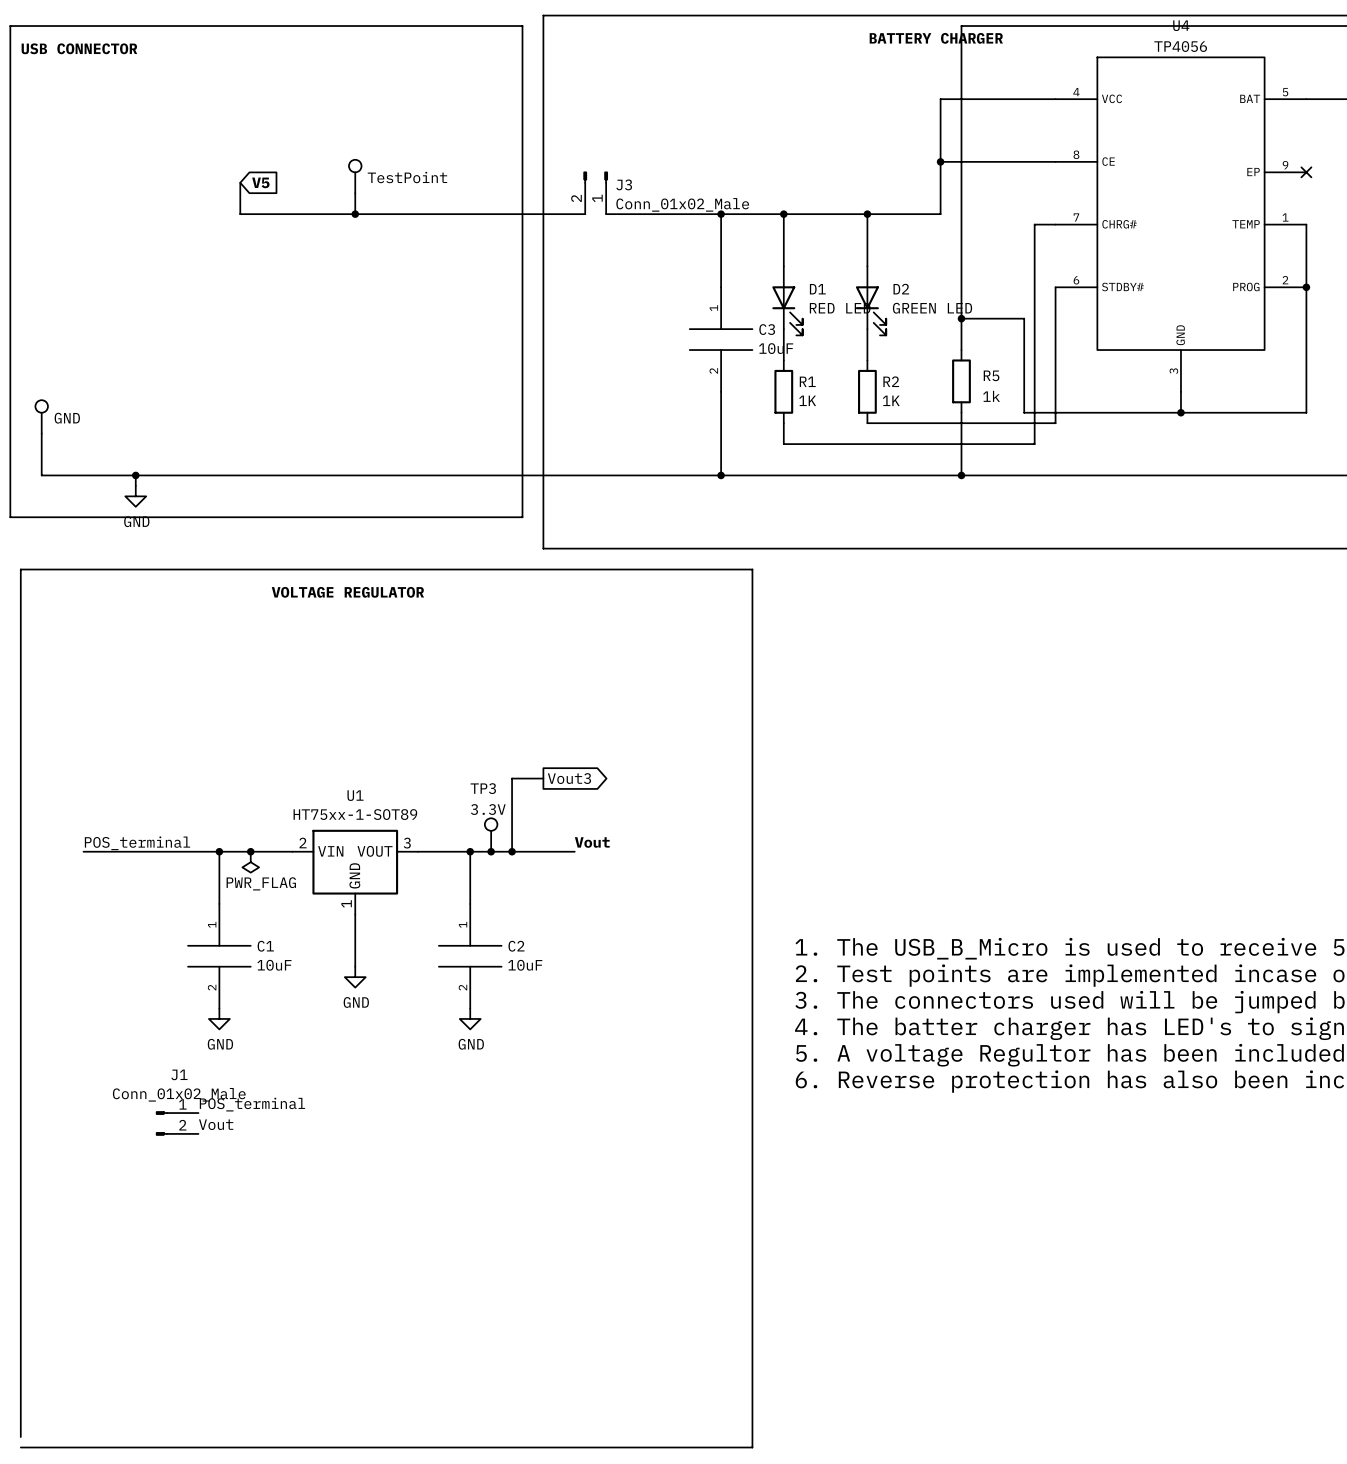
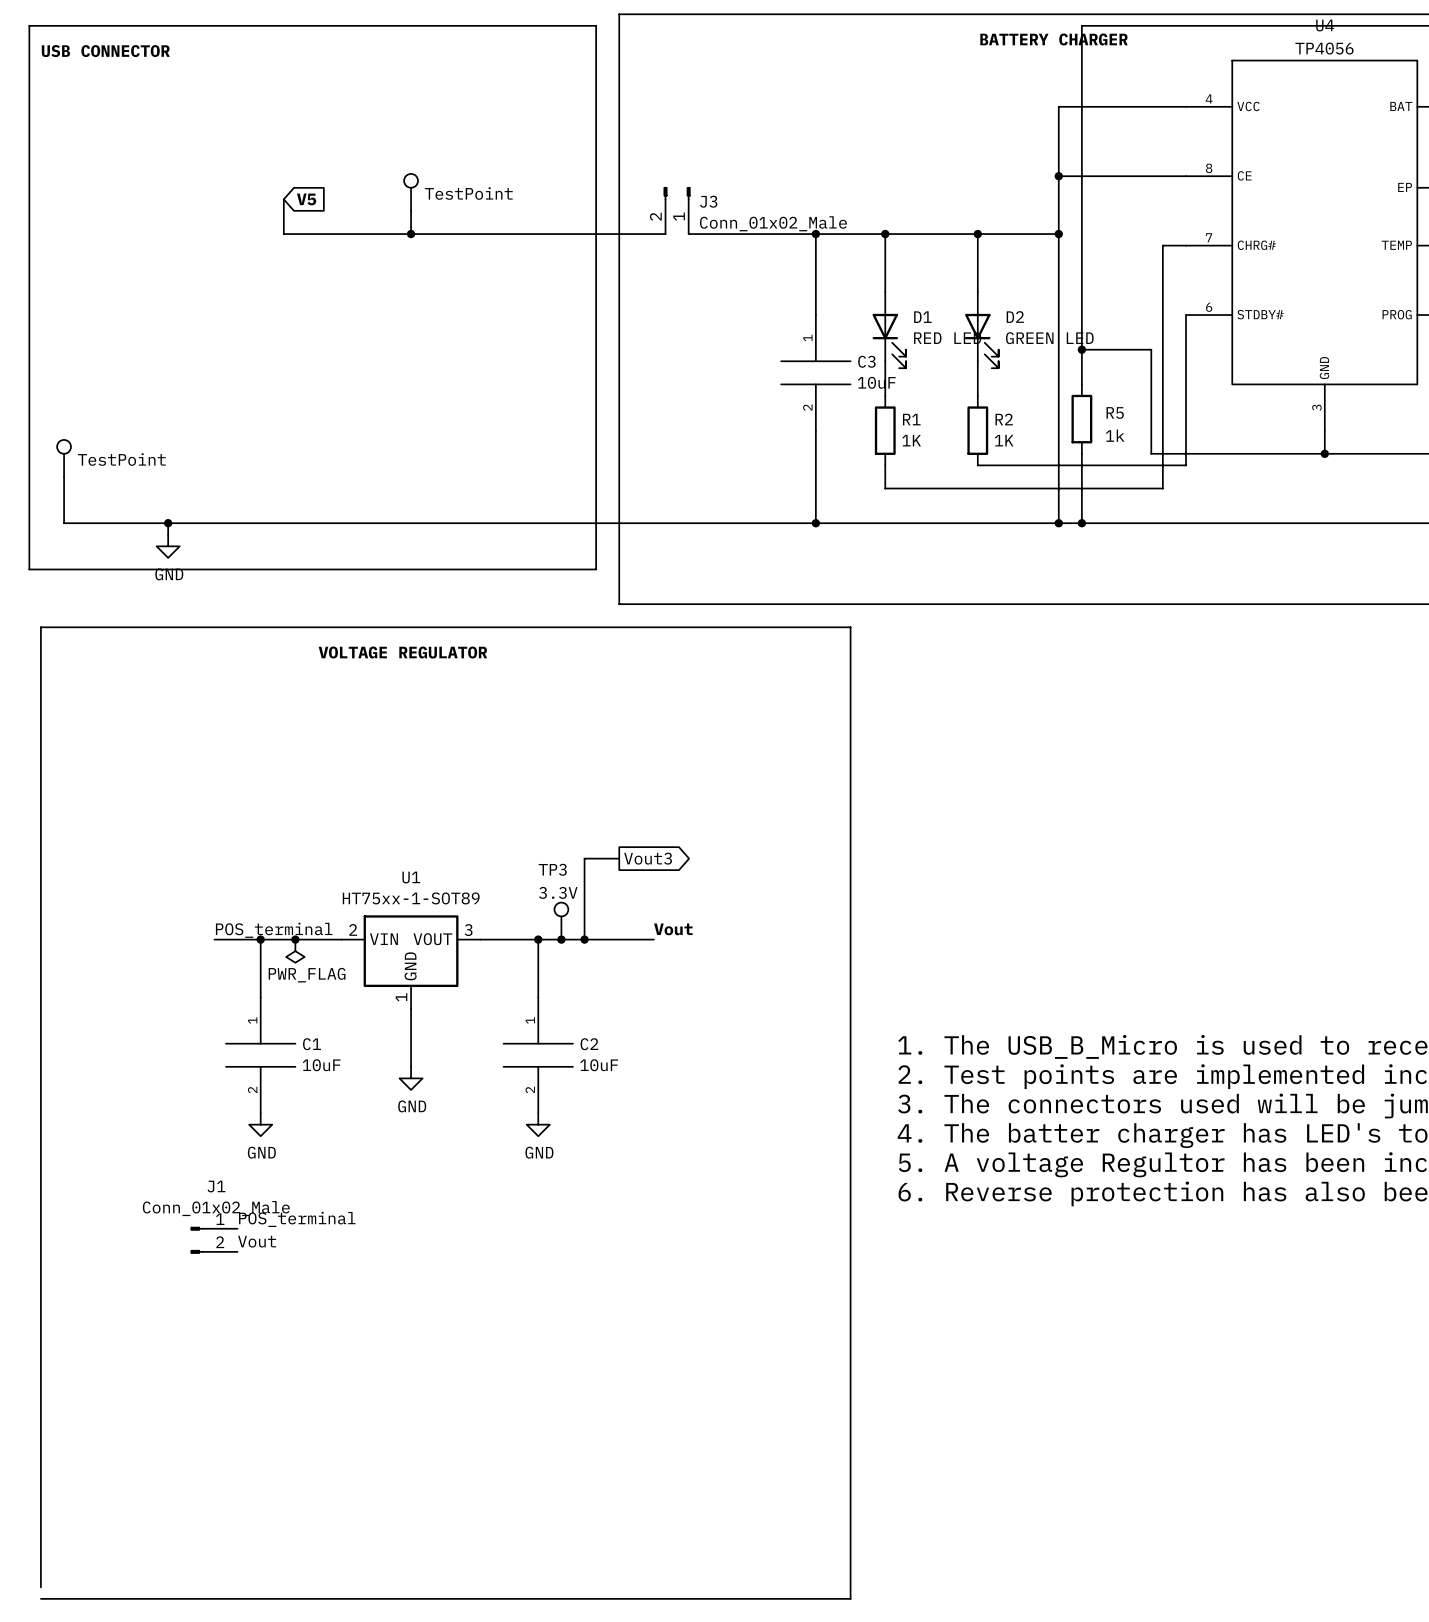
wire: none -> (1058, 234) (1058, 523)
junction: none -> (1058, 234)
part value: GND (67, 418) -> TestPoint (121, 459)
junction: none -> (1058, 523)
label position: POS_terminal (137, 843) -> POS_terminal (274, 930)
wire: (83, 851) (177, 851) -> none

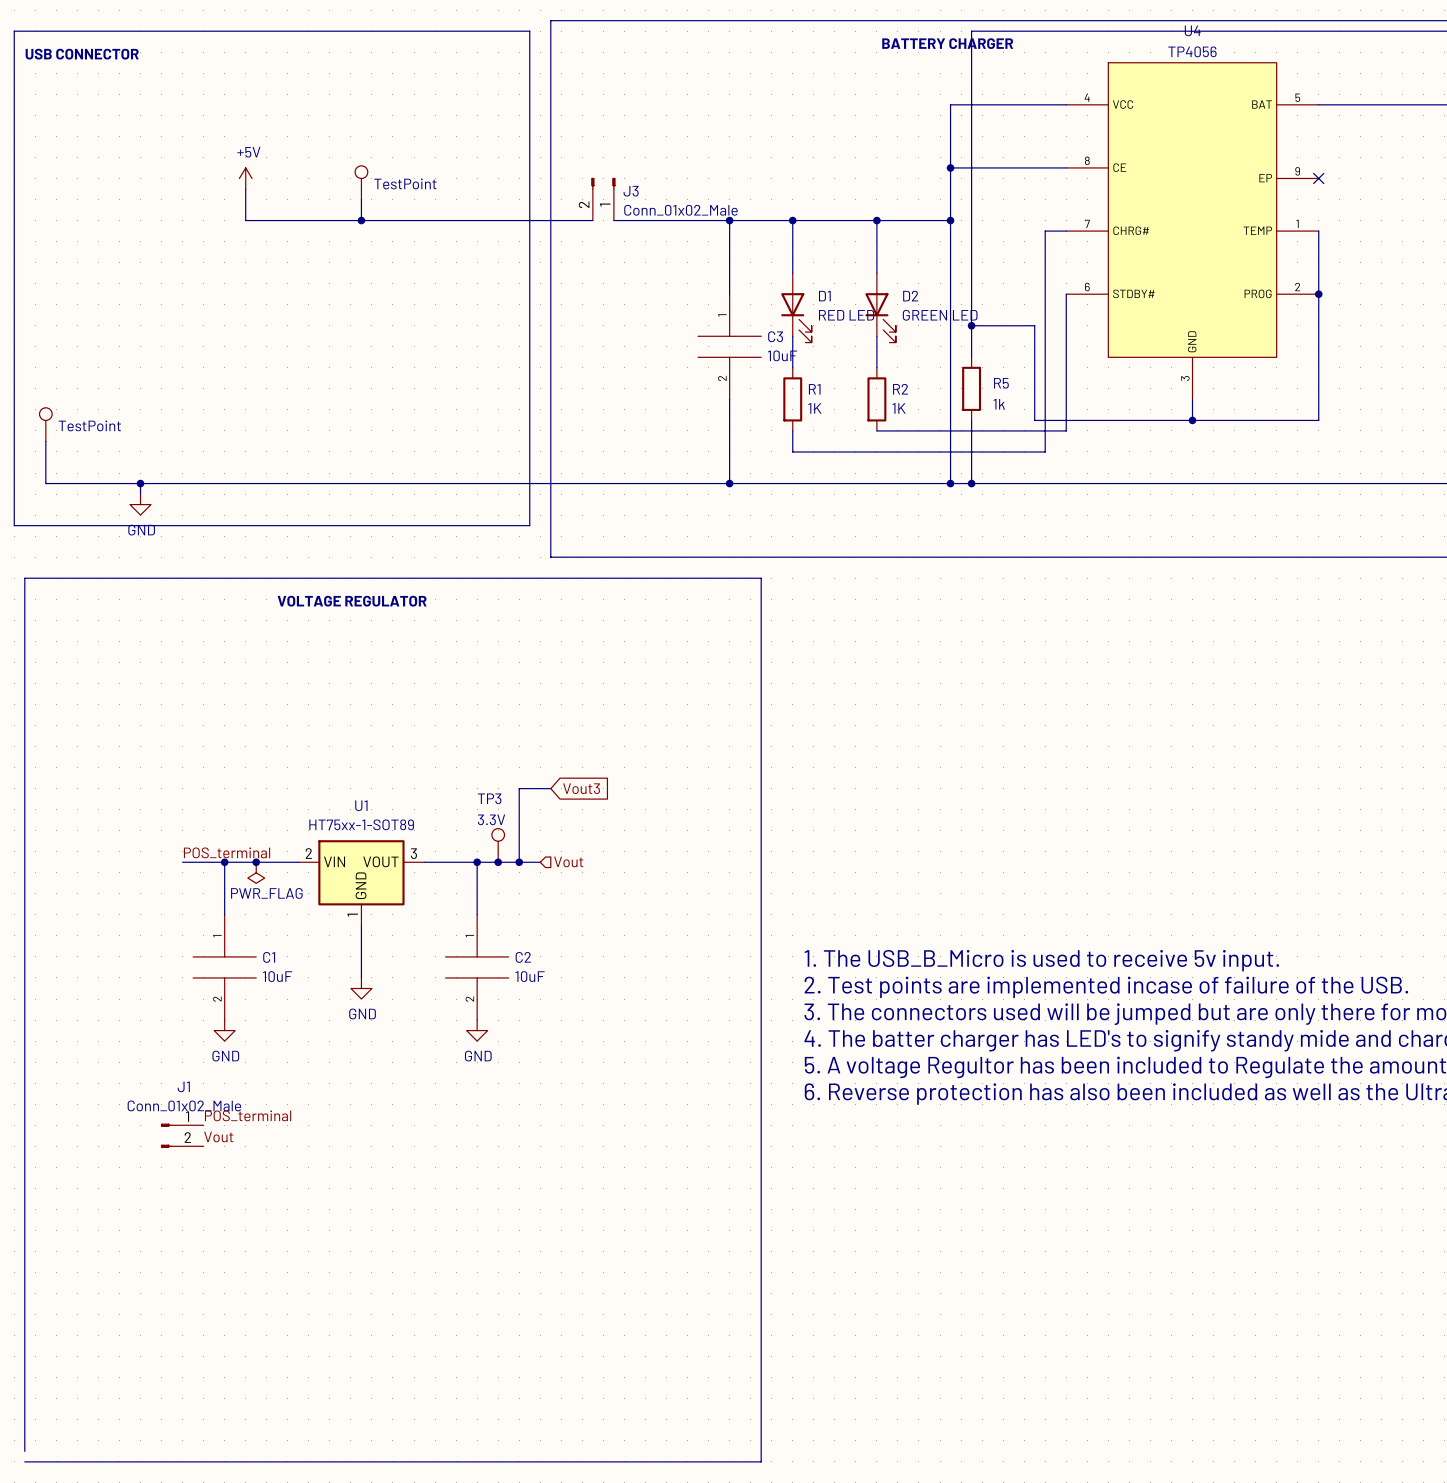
power symbol: none -> +5V (245, 178)
global label: V5 (306, 199) -> none
global label shape: output (648, 858) -> input (581, 788)
label: Vout (673, 929) -> none
wire: (607, 939) (653, 939) -> none
hierarchical label: none -> Vout (568, 861)

